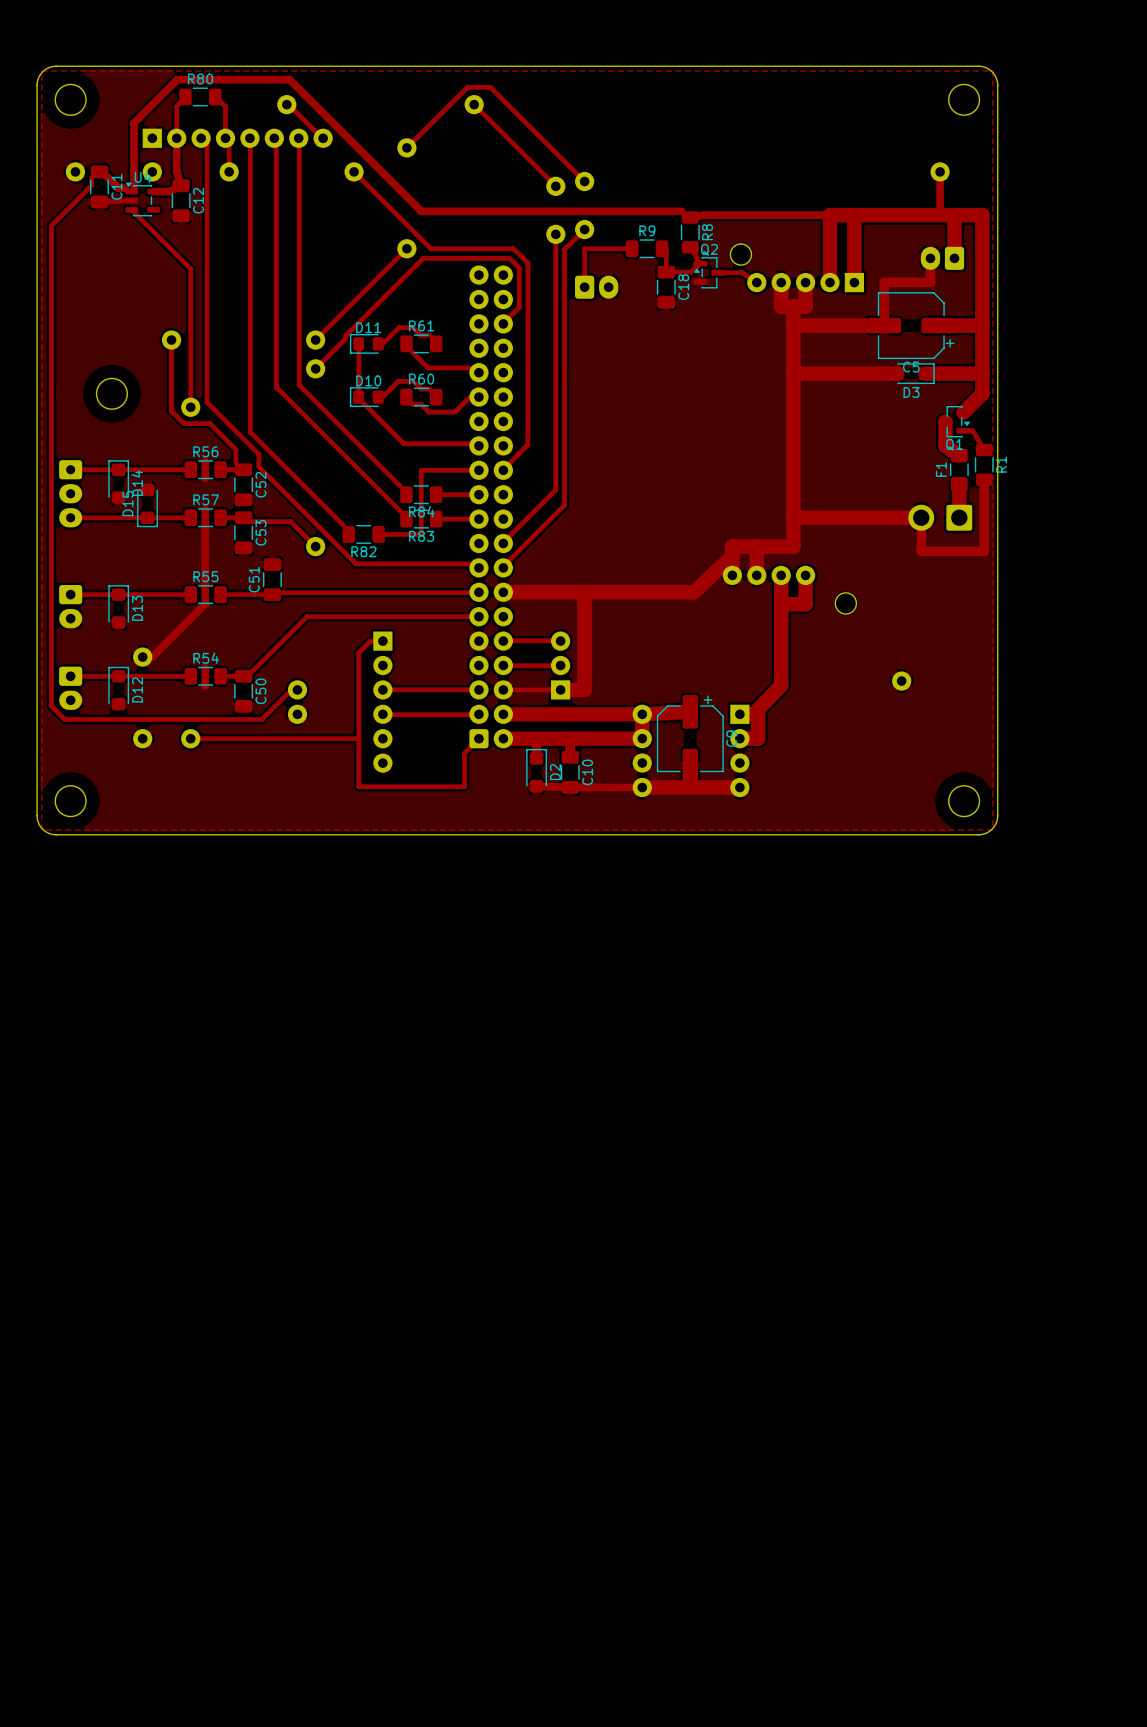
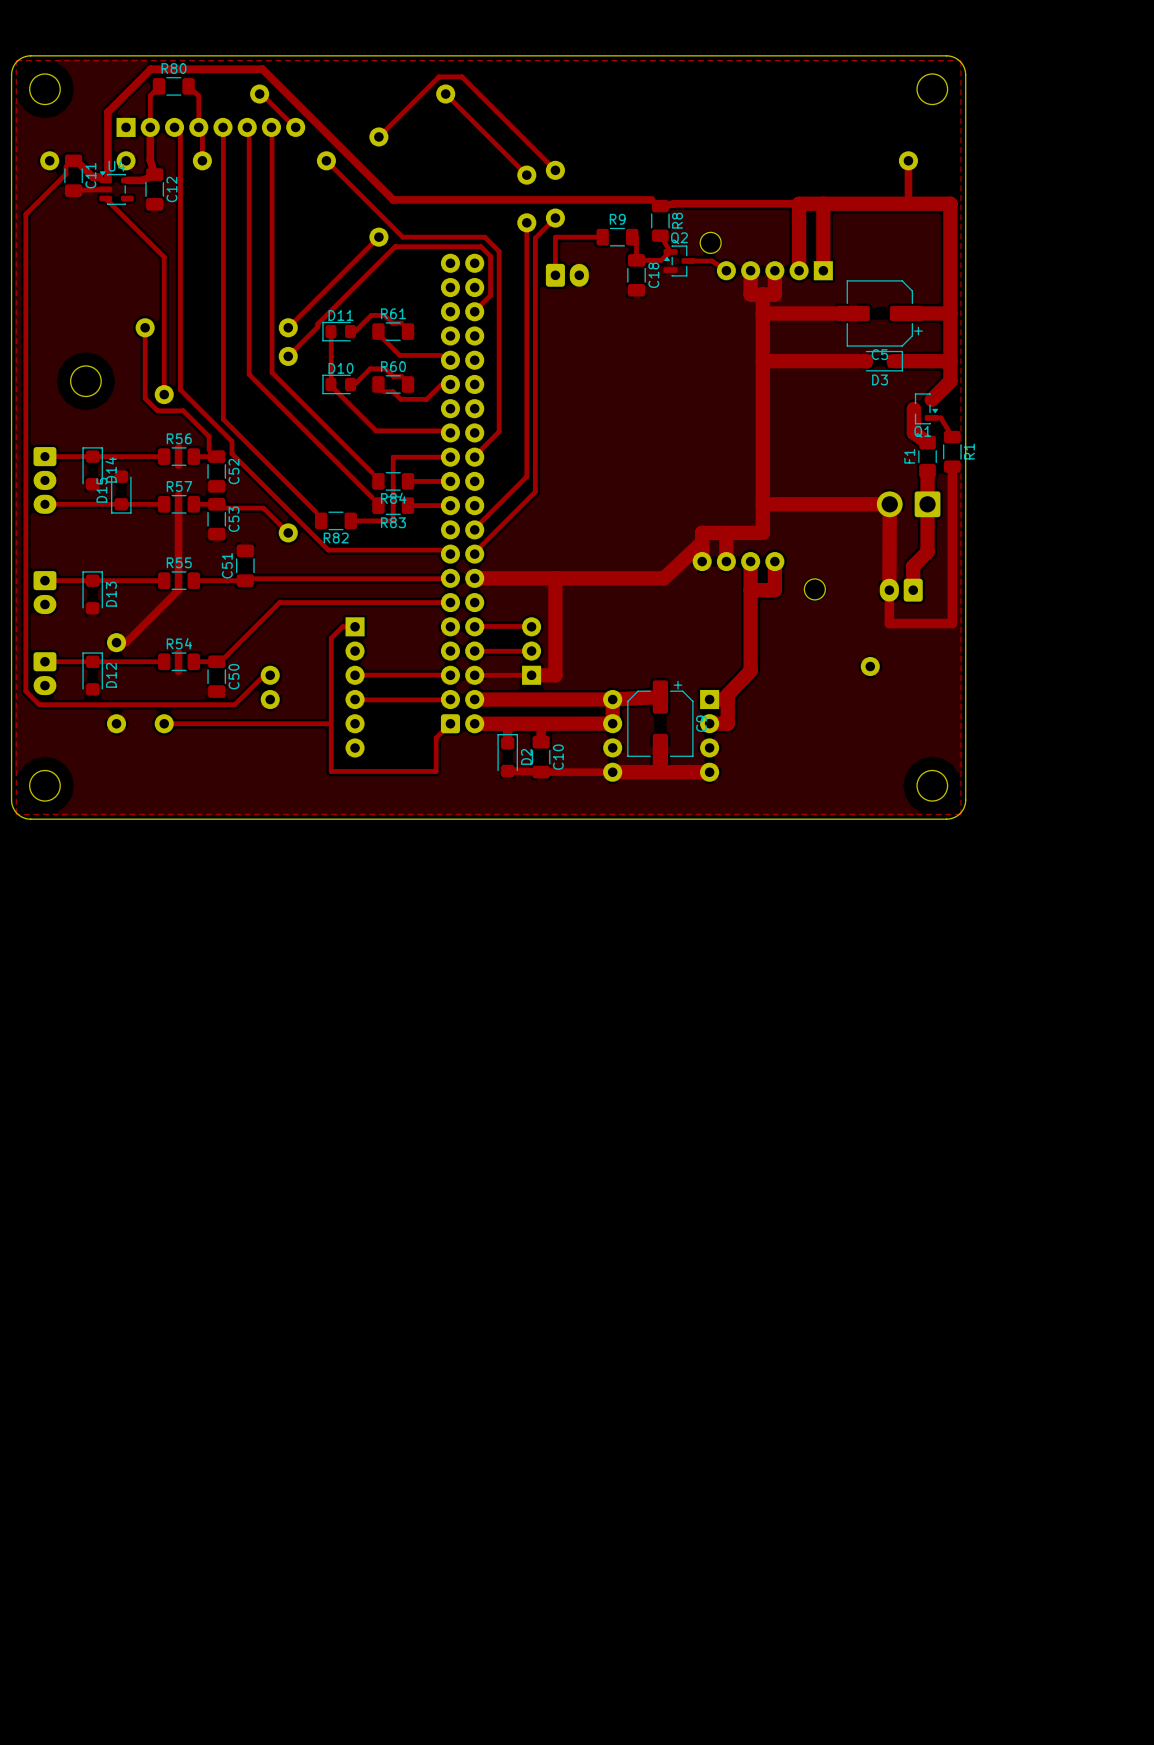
track: (954, 215) (954, 258) -> none
track: (930, 258) (930, 282) (884, 282) (884, 325) -> none
part: (942, 258) -> none
track: (921, 517) (921, 551) (984, 551) -> (889, 504) (889, 623) (952, 623) (952, 537)
track: none -> (927, 504) (927, 552) (913, 566) (913, 590)
part: none -> (901, 590)

